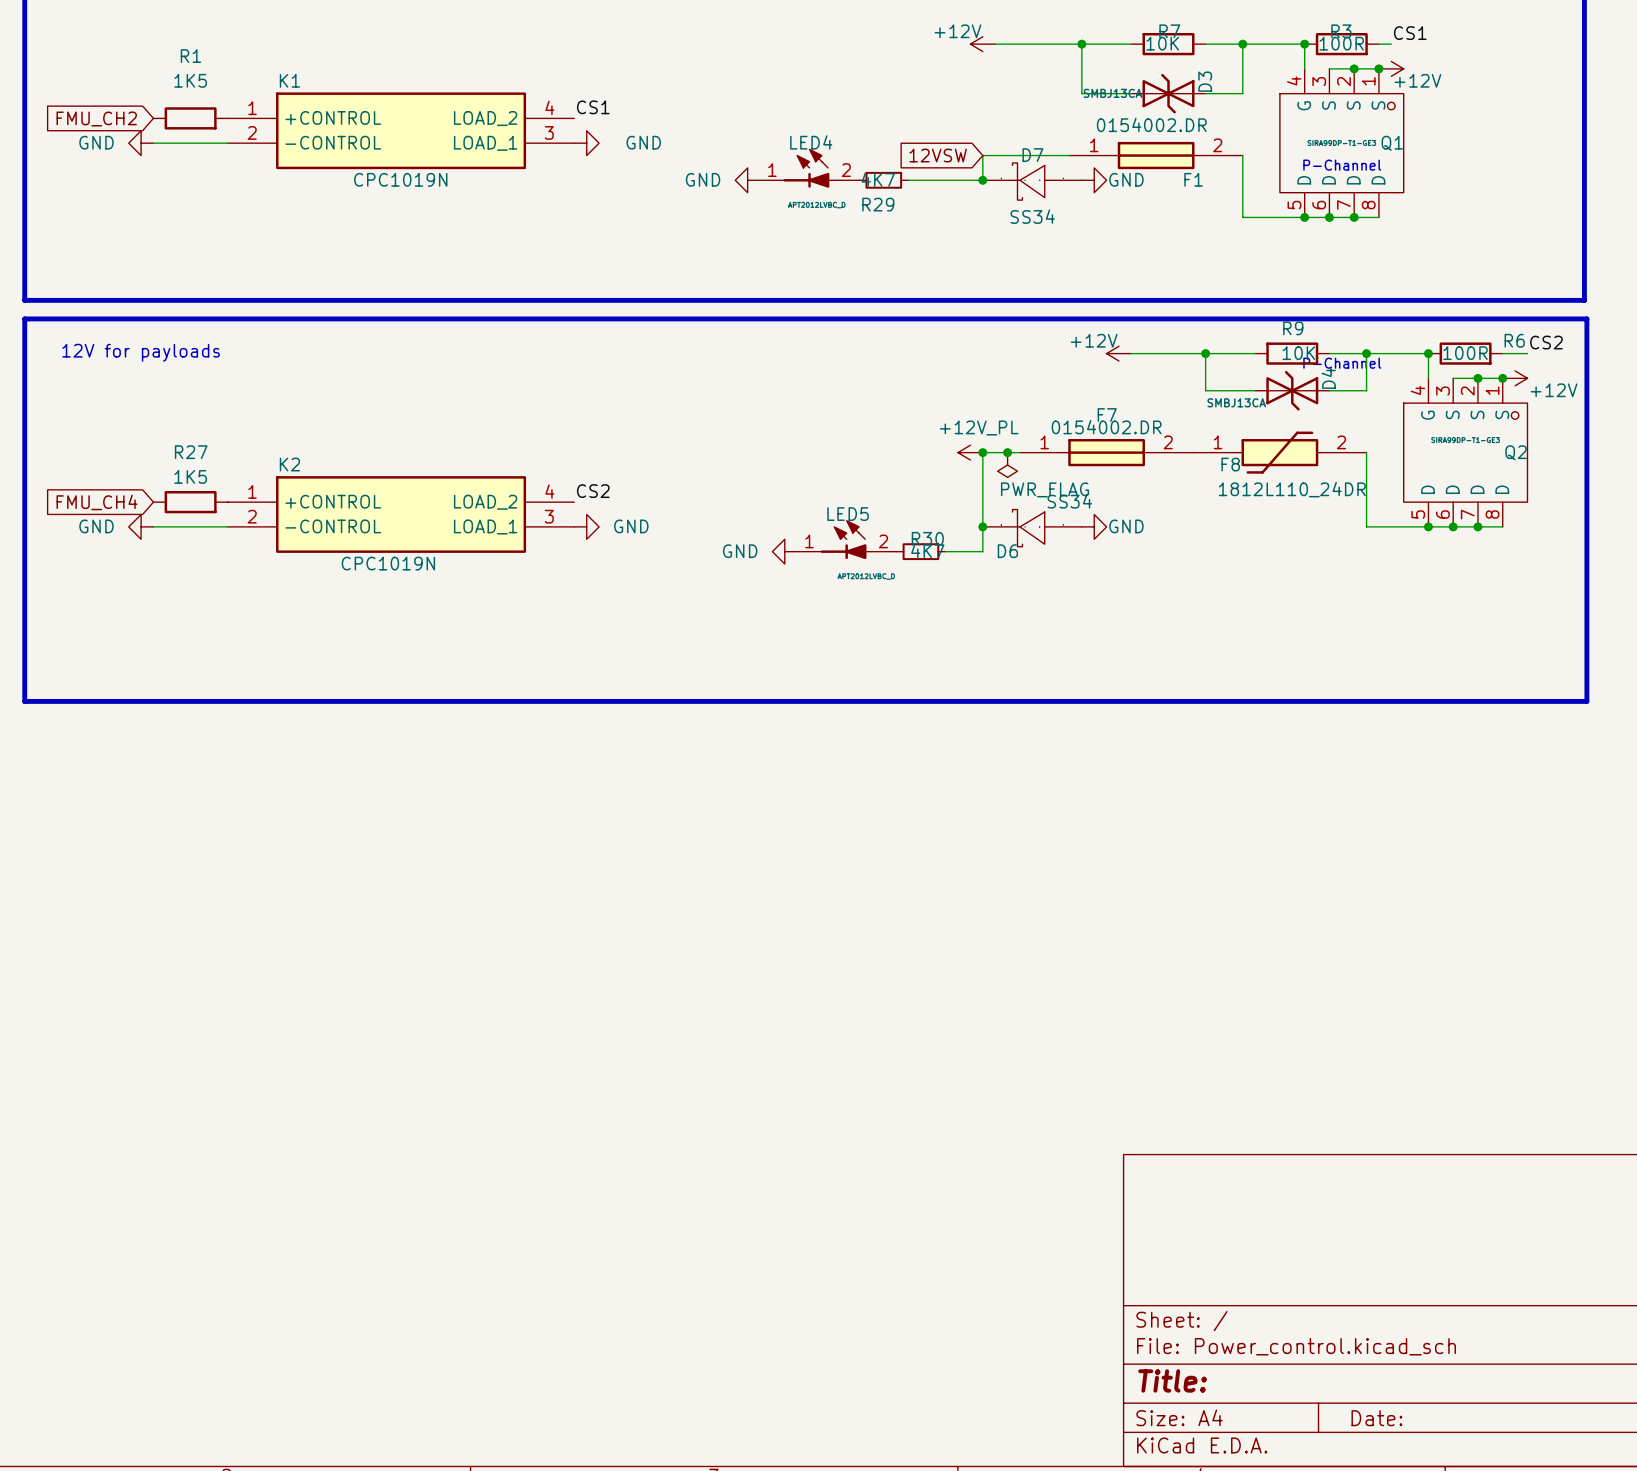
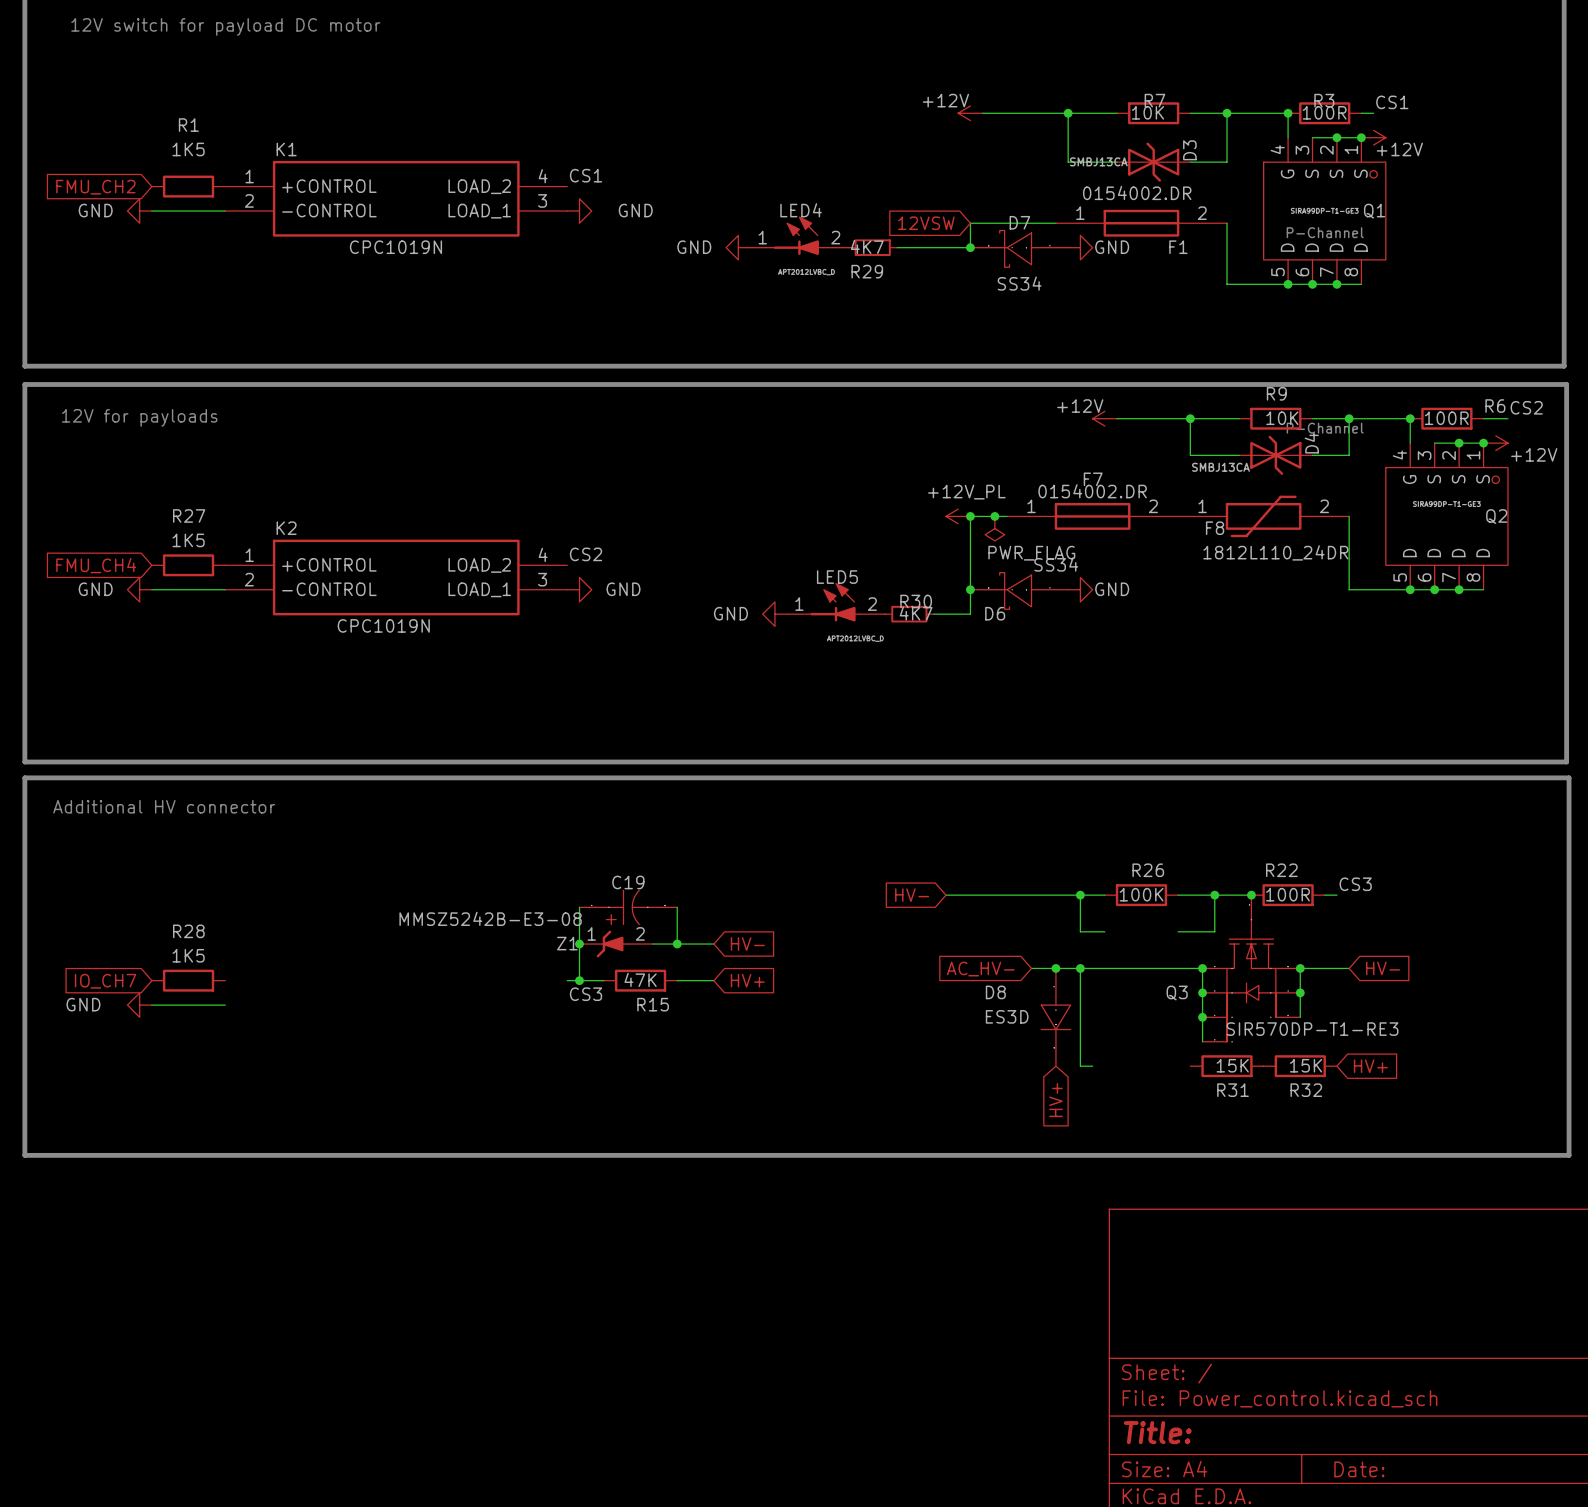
line: none -> (24, 777) (1569, 777) (1569, 1155) (24, 1155) (24, 777)
text: none -> Additional HV connector (164, 806)
label: none -> CS3 (1355, 884)
global label: none -> HV- (912, 895)
wire: none -> (946, 895) (1104, 895)
wire: none -> (1080, 895) (1080, 931) (1104, 931)
junction: none -> (1080, 895)
R26: none -> 100K (1141, 895)
wire: none -> (1178, 895) (1251, 895)
wire: none -> (1214, 895) (1214, 931) (1178, 931)
junction: none -> (1214, 895)
junction: none -> (1251, 895)
R22: none -> 100R (1288, 895)
wire: none -> (1324, 895) (1336, 895)
wire: none -> (579, 907) (579, 980)
C19: none -> (628, 907)
wire: none -> (677, 907) (677, 944)
junction: none -> (579, 944)
Z1: none -> MMSZ5242B-E3-08 (616, 944)
wire: none -> (652, 944) (713, 944)
junction: none -> (677, 944)
global label: none -> HV- (747, 944)
wire: none -> (1031, 968) (1202, 968) (1202, 1041)
junction: none -> (1055, 968)
wire: none -> (1080, 968) (1080, 1066) (1092, 1066)
junction: none -> (1080, 968)
junction: none -> (1202, 968)
Q3: none -> SIR570DP-T1-RE3 (1251, 968)
junction: none -> (1300, 968)
wire: none -> (1349, 968) (1300, 968) (1300, 1017)
global label: none -> HV- (1383, 968)
global label: none -> AC_HV- (980, 969)
global label: none -> IO_CH7 (105, 981)
R28: none -> 1K5 (188, 980)
wire: none -> (567, 980) (603, 980)
junction: none -> (579, 980)
R15: none -> 47K (640, 980)
wire: none -> (677, 980) (713, 980)
global label: none -> HV+ (747, 980)
junction: none -> (1202, 992)
junction: none -> (1300, 992)
label: none -> CS3 (585, 994)
power symbol: none -> GND (139, 1005)
wire: none -> (151, 1005) (225, 1005)
D8: none -> ES3D (1055, 1017)
junction: none -> (1202, 1017)
R31: none -> 15K (1226, 1066)
R32: none -> 15K (1300, 1066)
global label: none -> HV+ (1370, 1066)
global label: none -> HV+ (1055, 1100)

